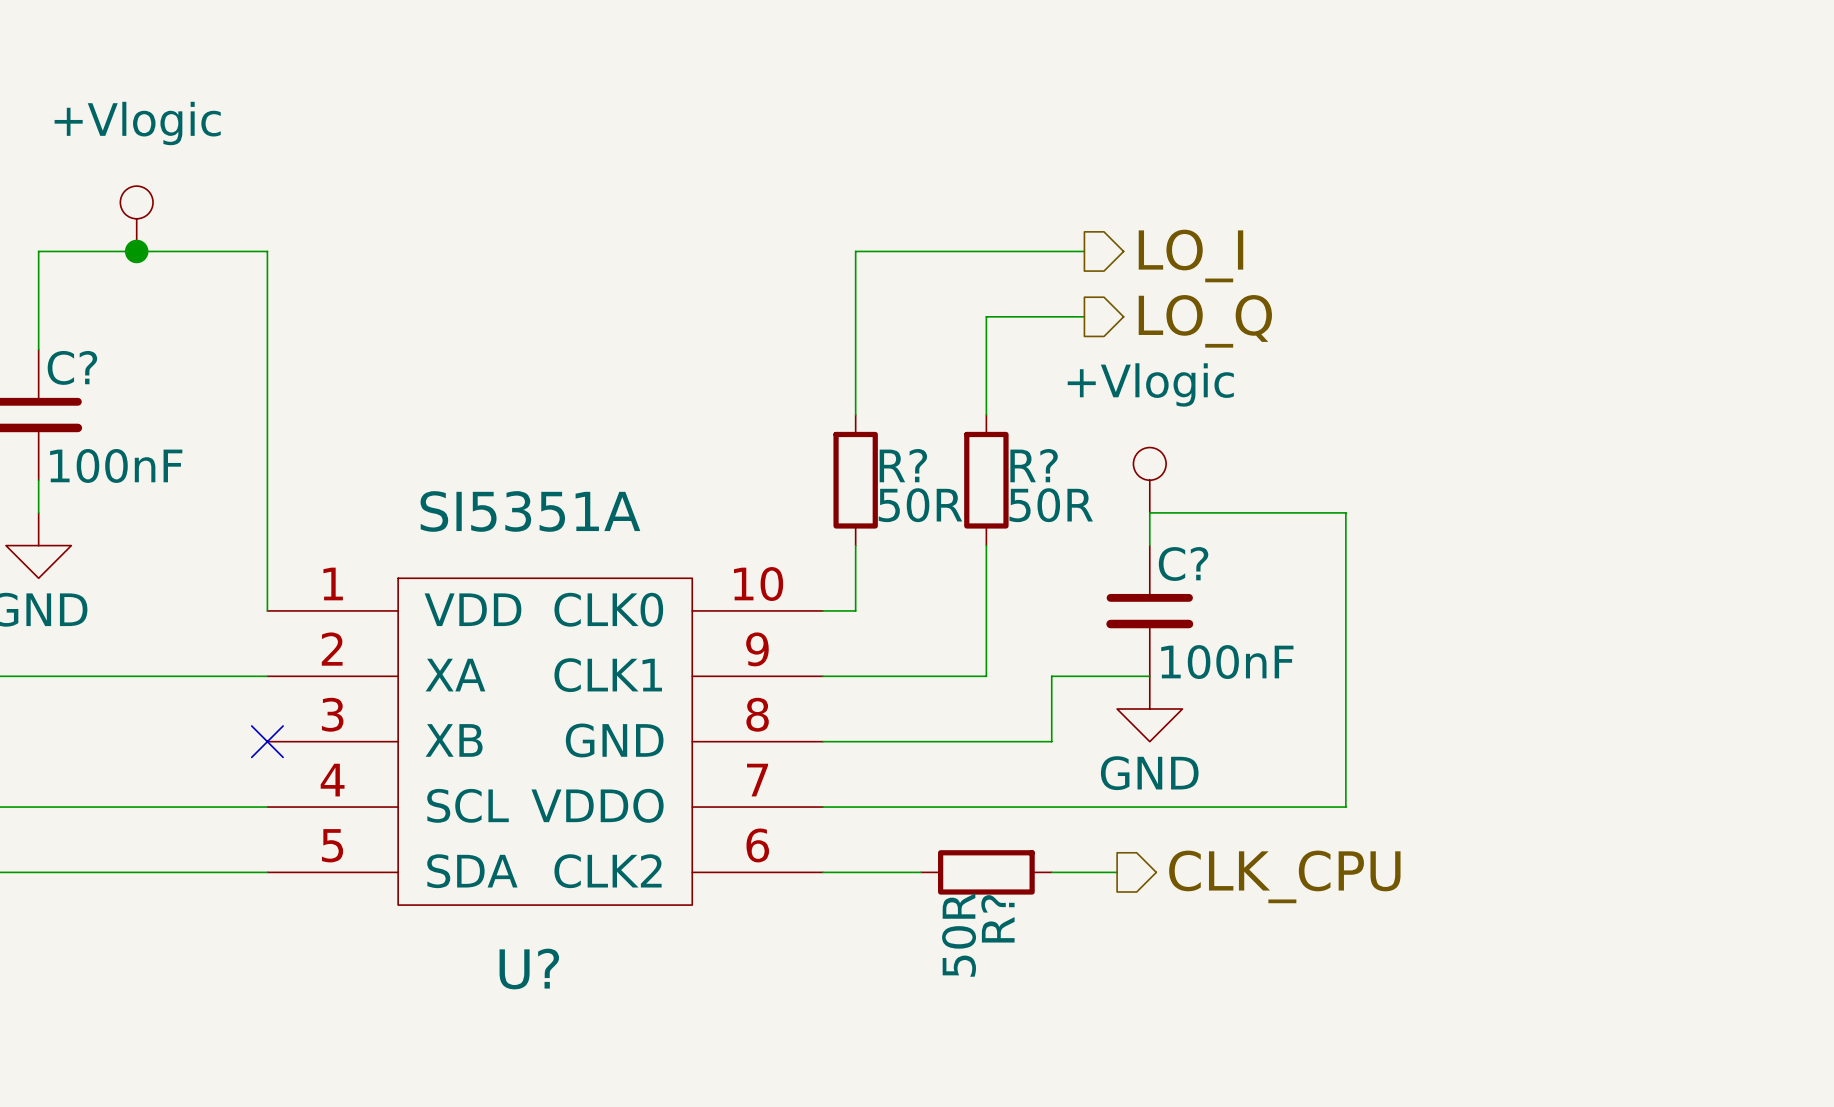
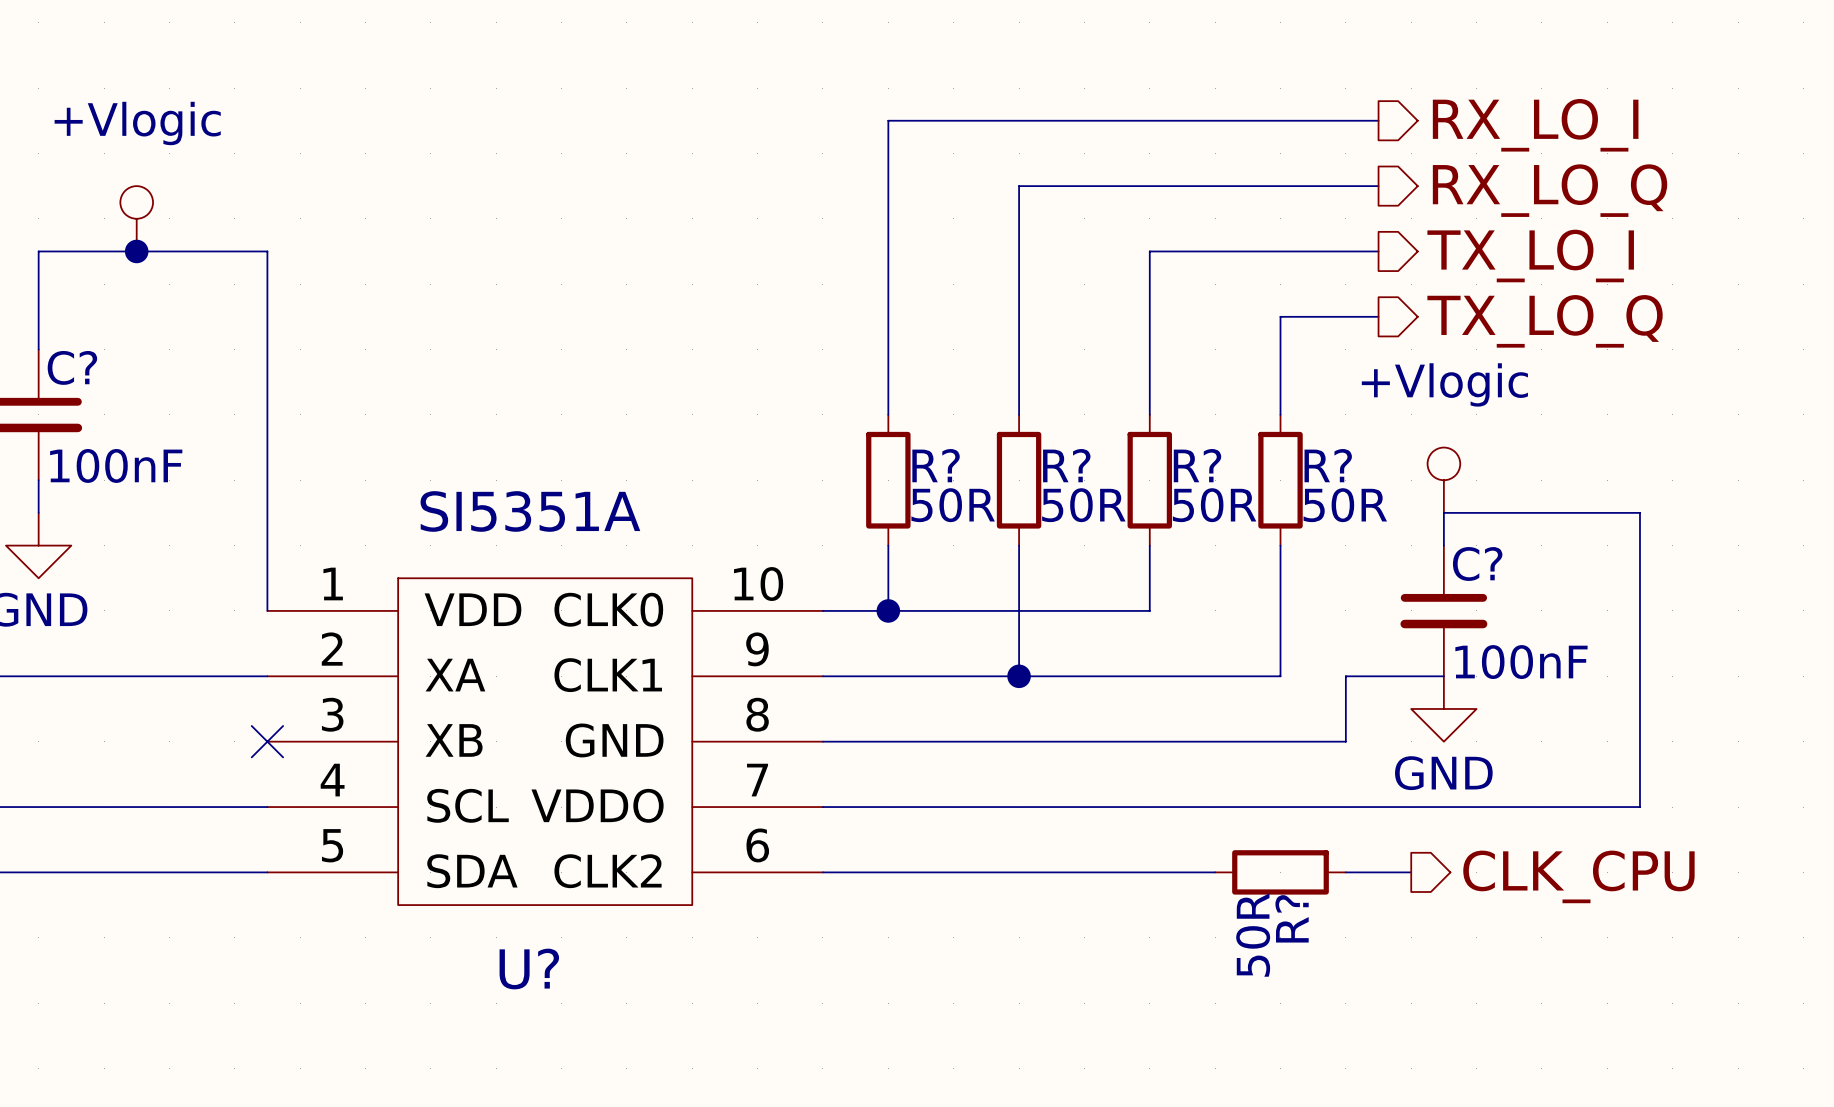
wire: none -> (1378, 120) (888, 120) (888, 414)
hierarchical label: none -> RX_LO_I (1535, 125)
wire: none -> (1378, 186) (1019, 186) (1019, 414)
hierarchical label: none -> RX_LO_Q (1550, 190)
wire: (1084, 251) (855, 251) (855, 414) -> (1378, 251) (1149, 251) (1149, 414)
hierarchical label: LO_I (1190, 255) -> none
hierarchical label: none -> TX_LO_I (1530, 255)
wire: (1084, 316) (986, 316) (986, 414) -> (1378, 316) (1280, 316) (1280, 414)
hierarchical label: LO_Q (1205, 321) -> none
hierarchical label: none -> TX_LO_Q (1545, 321)
R? position: (855, 480) -> (888, 480)
R? position: (986, 480) -> (1019, 480)
R?: none -> 50R (1149, 480)
power symbol position: +Vlogic (1149, 480) -> +Vlogic (1443, 480)
R?: none -> 50R (1280, 480)
wire: (855, 545) (855, 610) -> (1149, 545) (1149, 610) (855, 610)
wire: none -> (888, 545) (888, 610)
wire: (986, 545) (986, 676) -> (1019, 545) (1019, 676)
wire: (1149, 545) (1149, 512) (1345, 512) (1345, 676) -> (1443, 676) (1345, 676)
wire: none -> (1280, 545) (1280, 676) (1149, 676)
junction: none -> (888, 610)
C? position: (1149, 610) -> (1443, 610)
junction: none -> (1019, 676)
wire: (1051, 676) (1051, 741) -> (1051, 676) (986, 676)
power symbol position: GND (1149, 708) -> GND (1443, 708)
wire: none -> (1051, 741) (1345, 741)
wire: (1345, 741) (1345, 807) -> (1443, 545) (1443, 512) (1639, 512) (1639, 807) (1345, 807)
wire: none -> (921, 872) (1051, 872)
R?: 50R (986, 872) -> none
wire: none -> (1117, 872) (1215, 872)
R?: none -> 50R (1280, 872)
wire: none -> (1345, 872) (1411, 872)
hierarchical label position: CLK_CPU (1284, 876) -> CLK_CPU (1578, 876)

